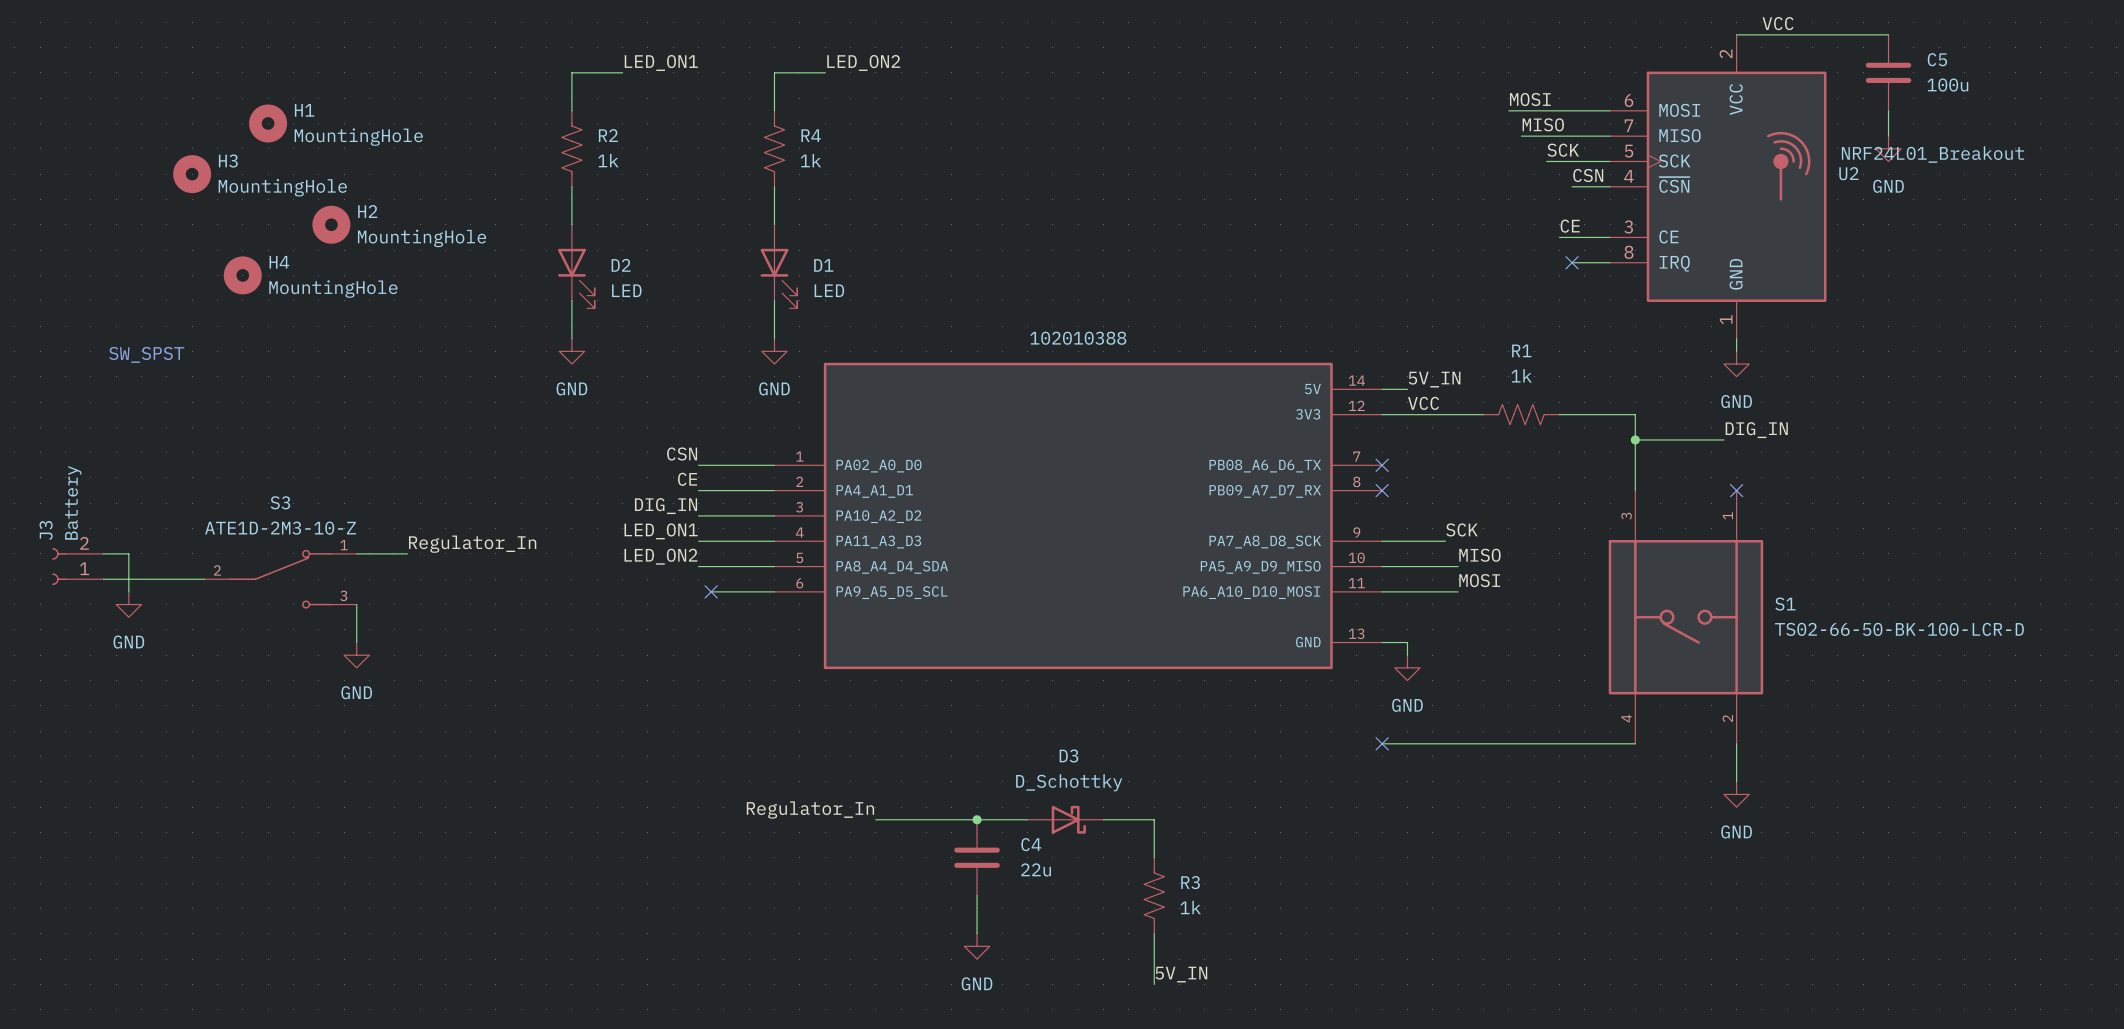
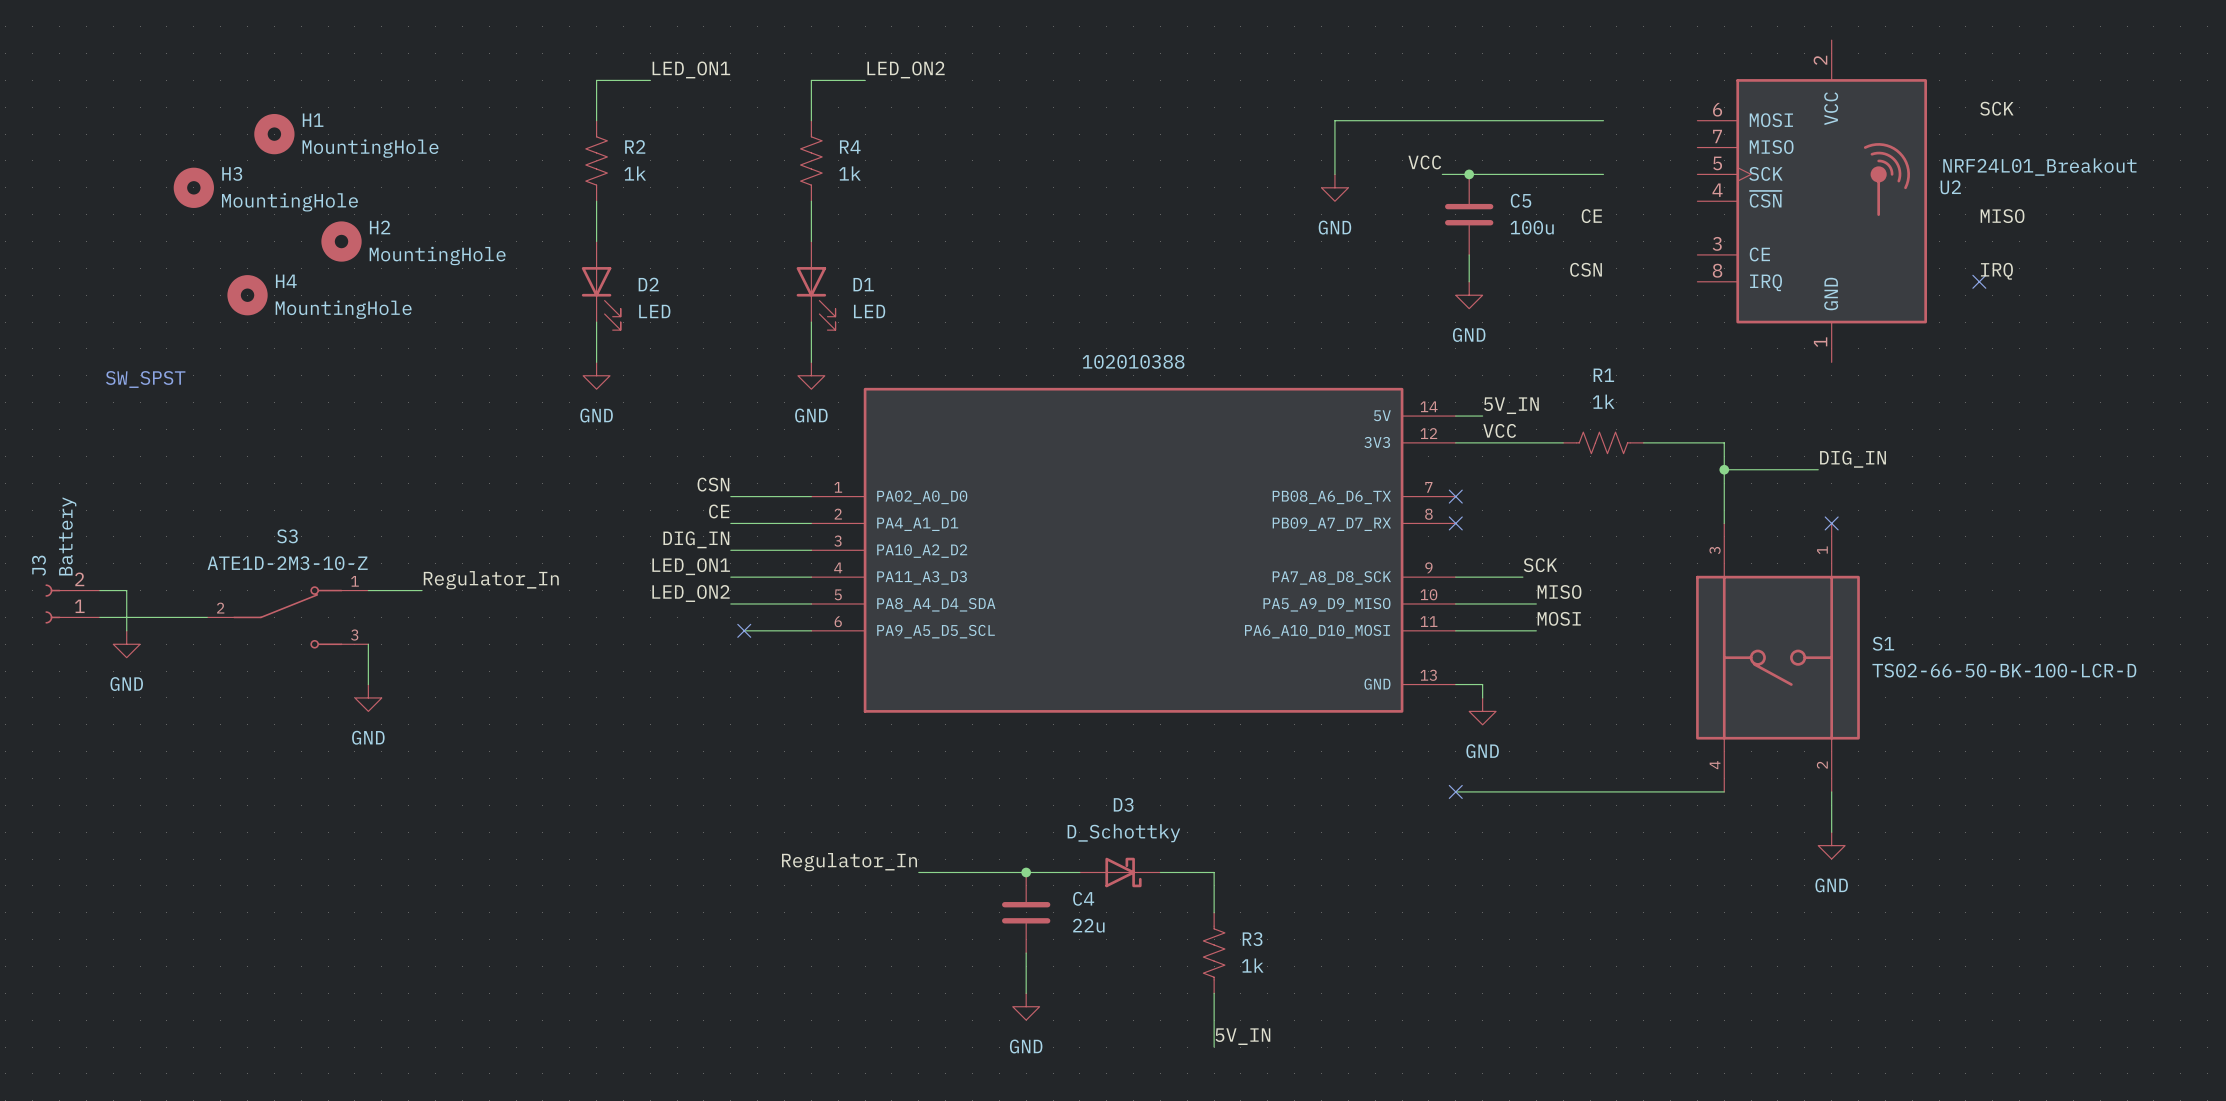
label: VCC (1778, 23) -> none
wire: (1736, 34) (1888, 34) -> none
C5 position: (1888, 72) -> (1469, 214)
label: MOSI (1530, 99) -> none
label: none -> SCK (1996, 108)
wire: none -> (1590, 120) (1334, 120) (1334, 174)
wire: (1521, 110) (1610, 110) -> none
wire: (1888, 110) (1888, 136) -> none
label: MISO (1543, 124) -> none
wire: (1521, 136) (1610, 136) -> none
power symbol: GND (1888, 148) -> none
label: none -> VCC (1424, 162)
label: SCK (1563, 150) -> none
wire: none -> (1442, 174) (1603, 174)
junction: none -> (1469, 174)
wire: (1546, 161) (1610, 161) -> none
power symbol: none -> GND (1334, 187)
label position: CSN (1588, 175) -> CSN (1586, 269)
wire: (1572, 186) (1610, 186) -> none
label: none -> MISO (2002, 216)
label position: CE (1570, 226) -> CE (1591, 216)
wire: none -> (1469, 254) (1469, 281)
wire: (1559, 237) (1610, 237) -> none
label: none -> IRQ (1996, 271)
wire: (1572, 262) (1610, 262) -> none
no-connect mark: (1572, 262) -> none
no-connect mark: none -> (1979, 281)
power symbol: none -> GND (1469, 295)
wire: (1736, 338) (1736, 351) -> none
power symbol: GND (1736, 364) -> none

